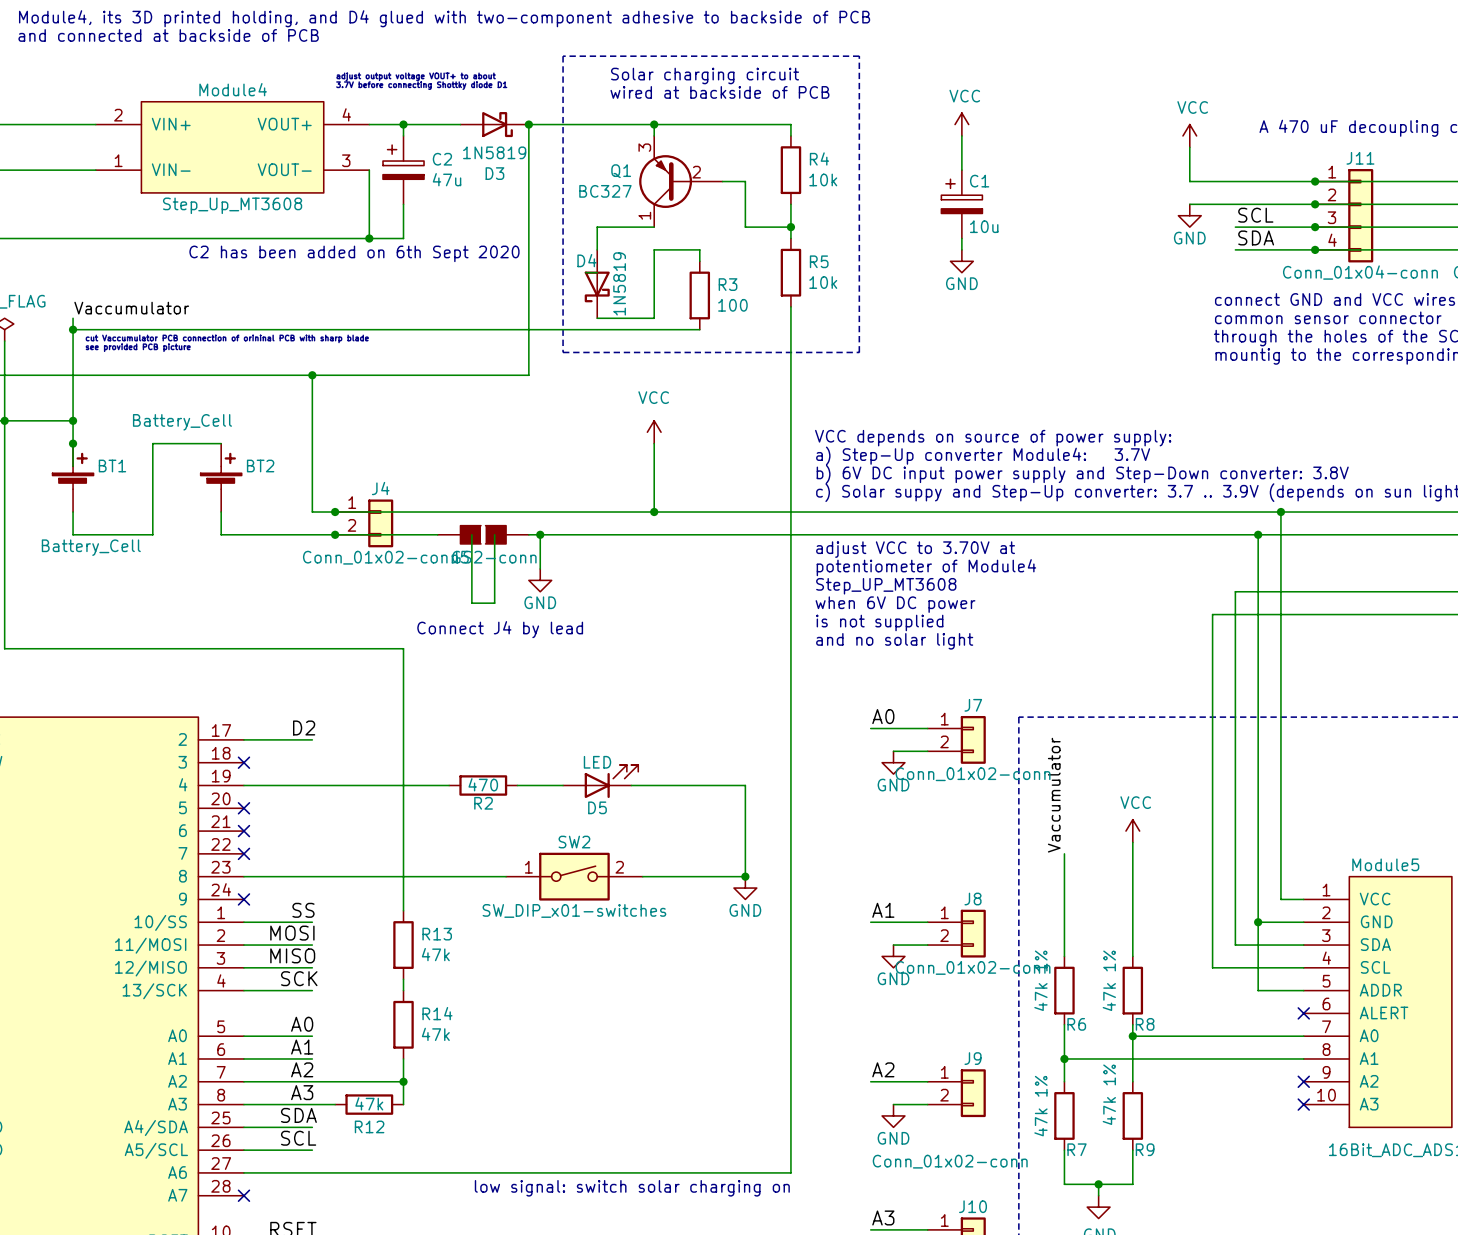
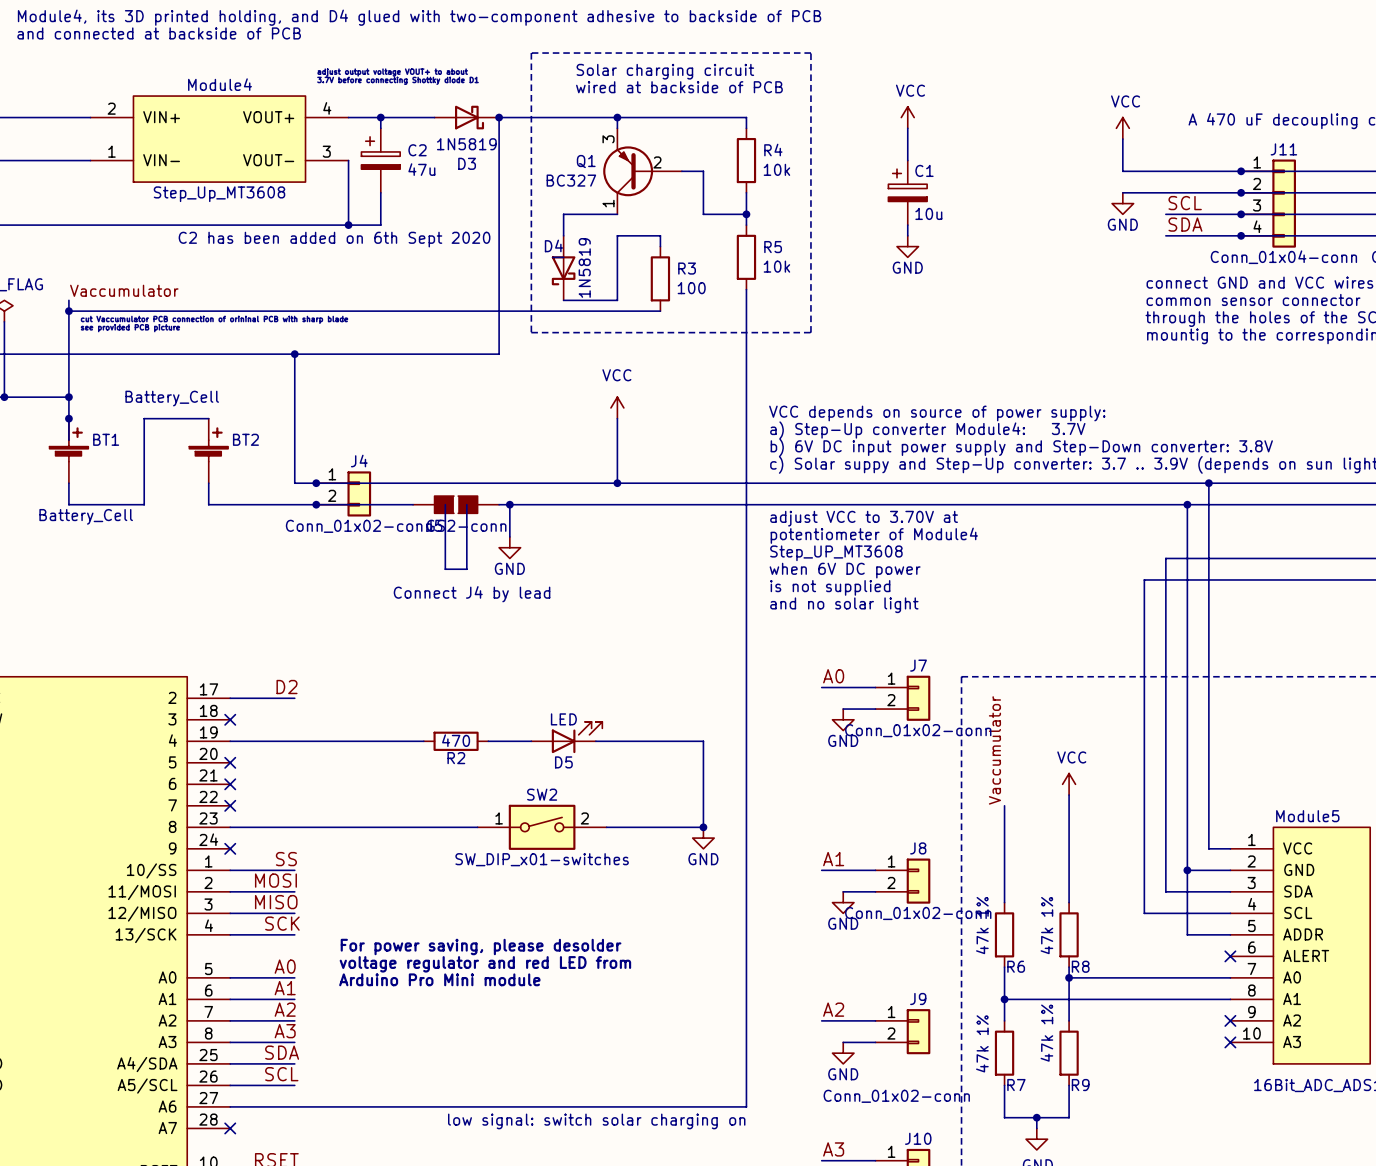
wire: (4, 420) (4, 648) (403, 648) (403, 910) -> none
R13: 47k (403, 945) -> none
wire: (403, 979) (403, 990) -> none
text: none -> For power saving, please desolder (481, 946)
text: none -> voltage regulator and red LED from (485, 964)
R14: 47k (403, 1024) -> none
text: none -> Arduino Pro Mini module (439, 979)
wire: (403, 1058) (403, 1104) -> none
wire: (312, 1081) (403, 1081) -> none
junction: (403, 1081) -> none
wire: (312, 1104) (335, 1104) -> none
R12: 47k (369, 1104) -> none

